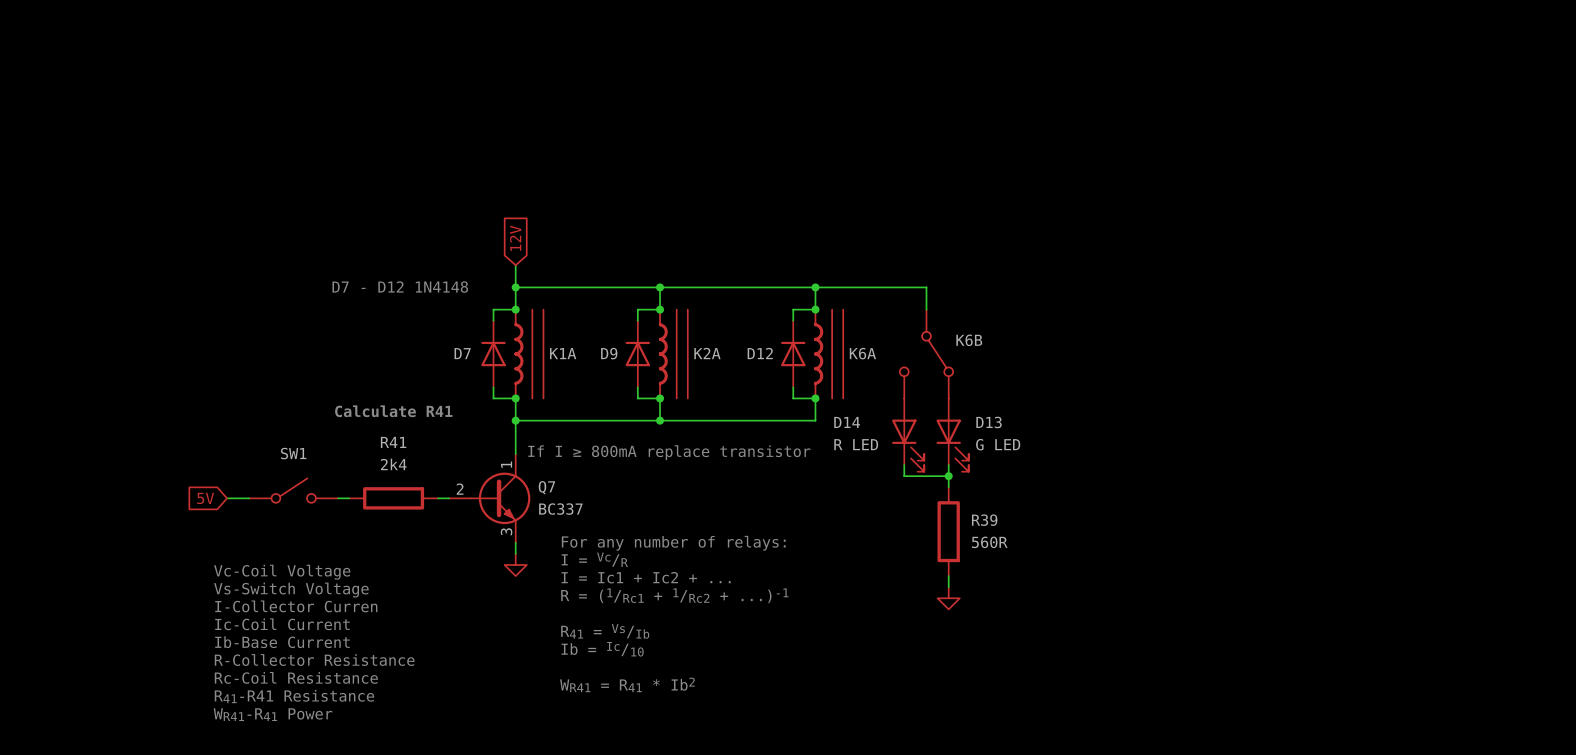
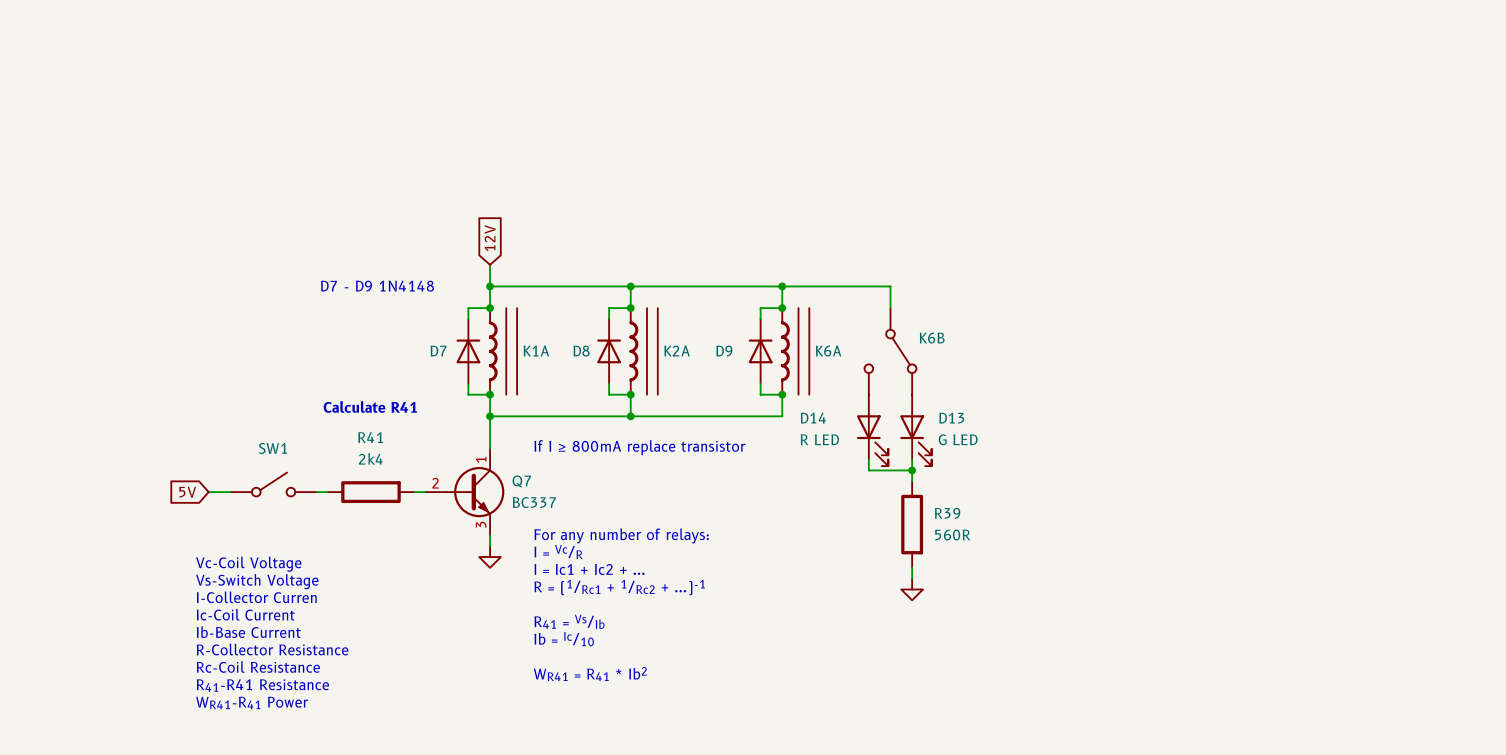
text: D7 - D12 1N4148 (400, 287) -> D7 - D9 1N4148 (377, 286)
D9 name: D9 (609, 353) -> D8 (581, 351)
D12 name: D12 (760, 353) -> D9 (724, 351)

